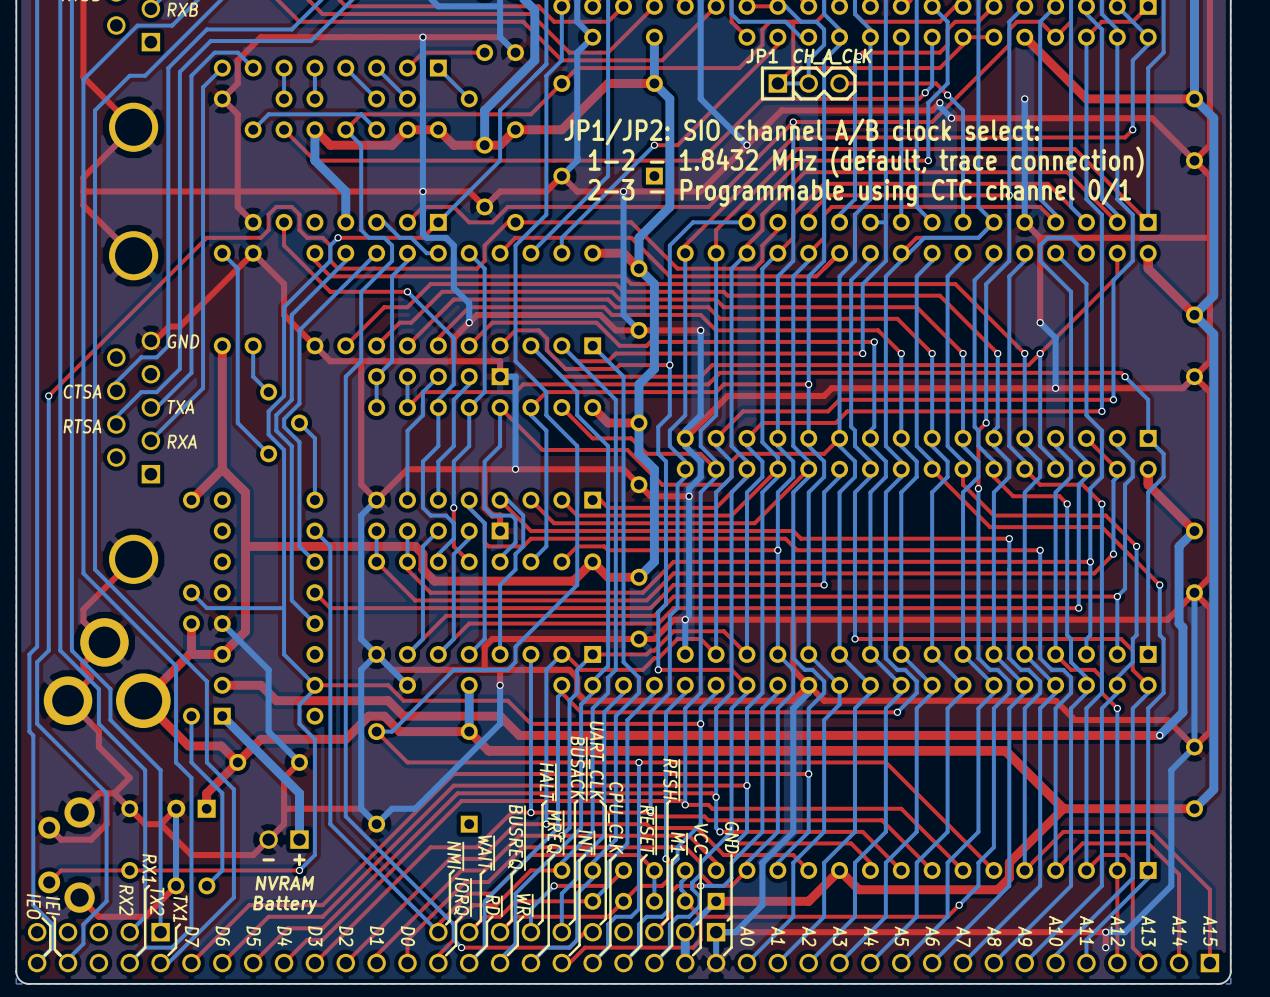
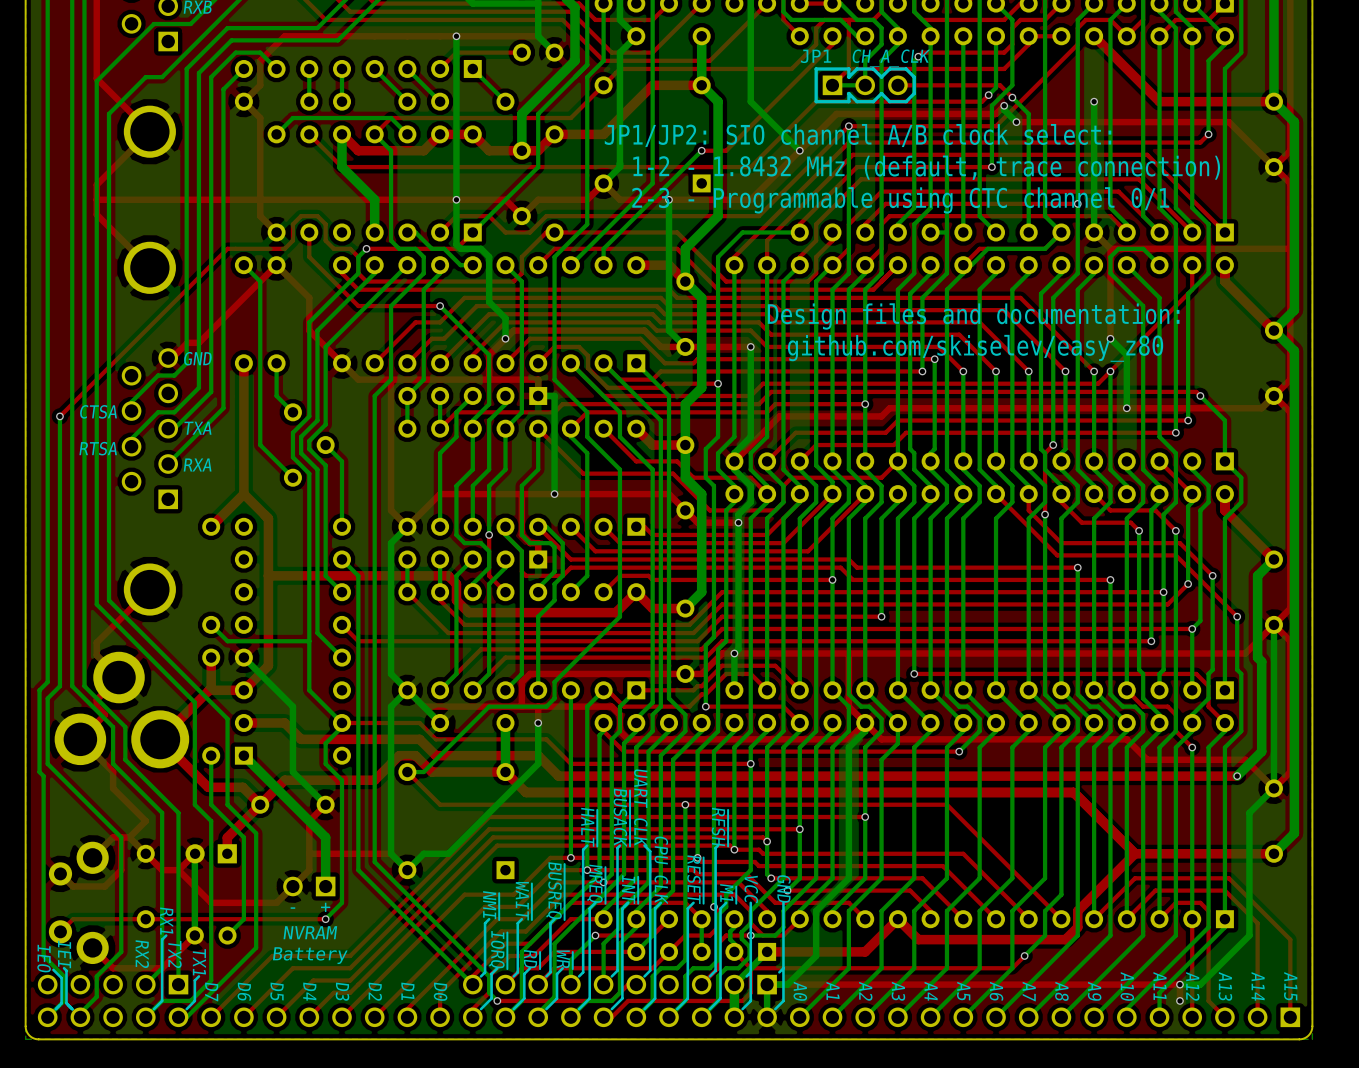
JP1 footprint: [760, 66, 857, 101] -> [814, 67, 916, 104]
text: none -> Design files and documentation: (973, 316)
text: none -> github.com/skiselev/easy_z80 (975, 348)

